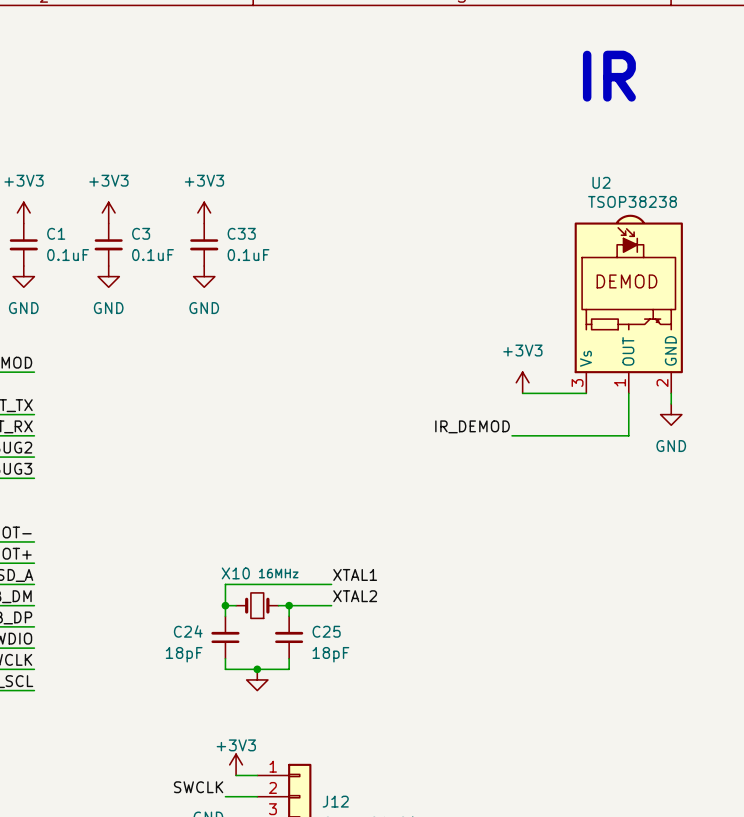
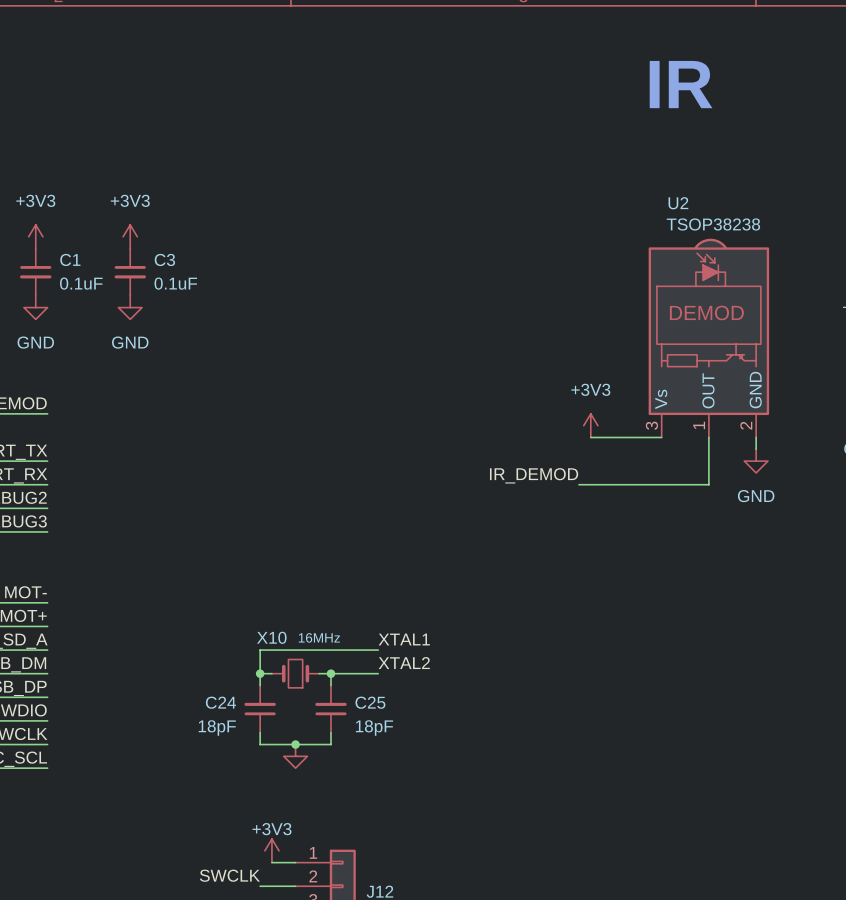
power symbol: +3V3 (204, 212) -> none
C33: (204, 244) -> none
power symbol: GND (204, 276) -> none

